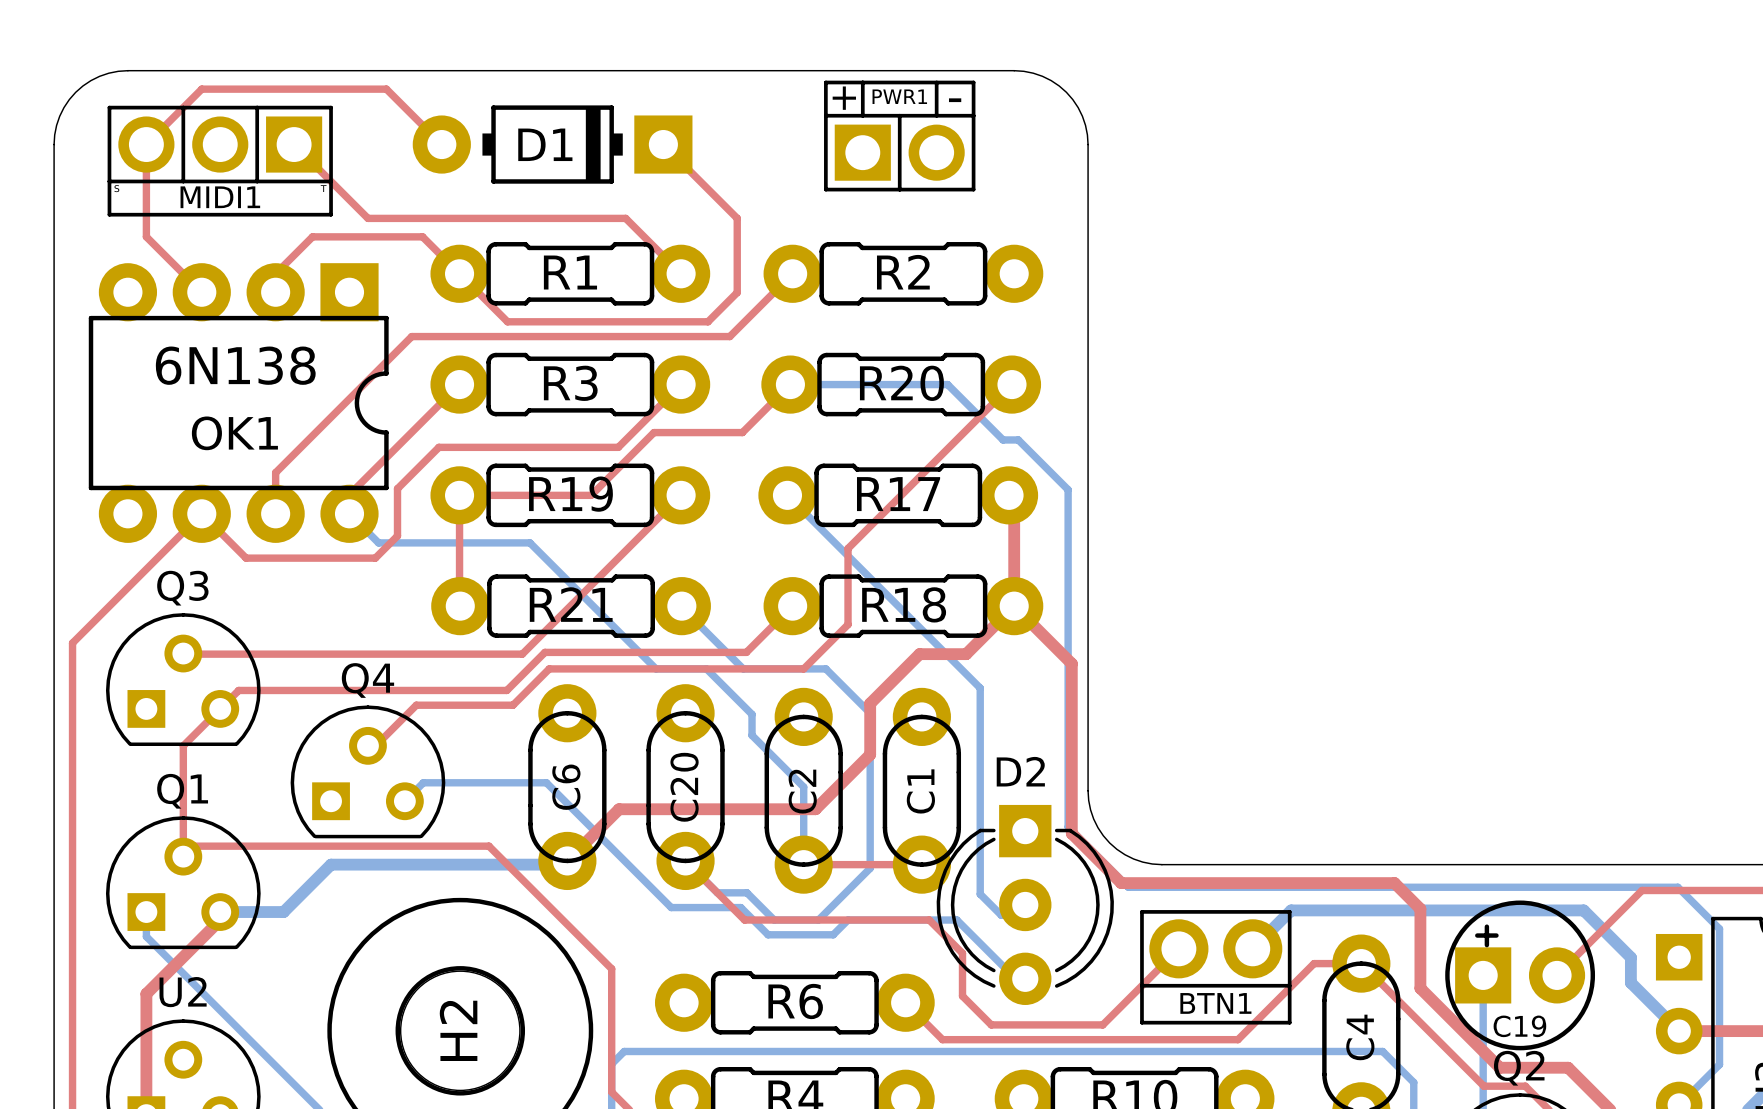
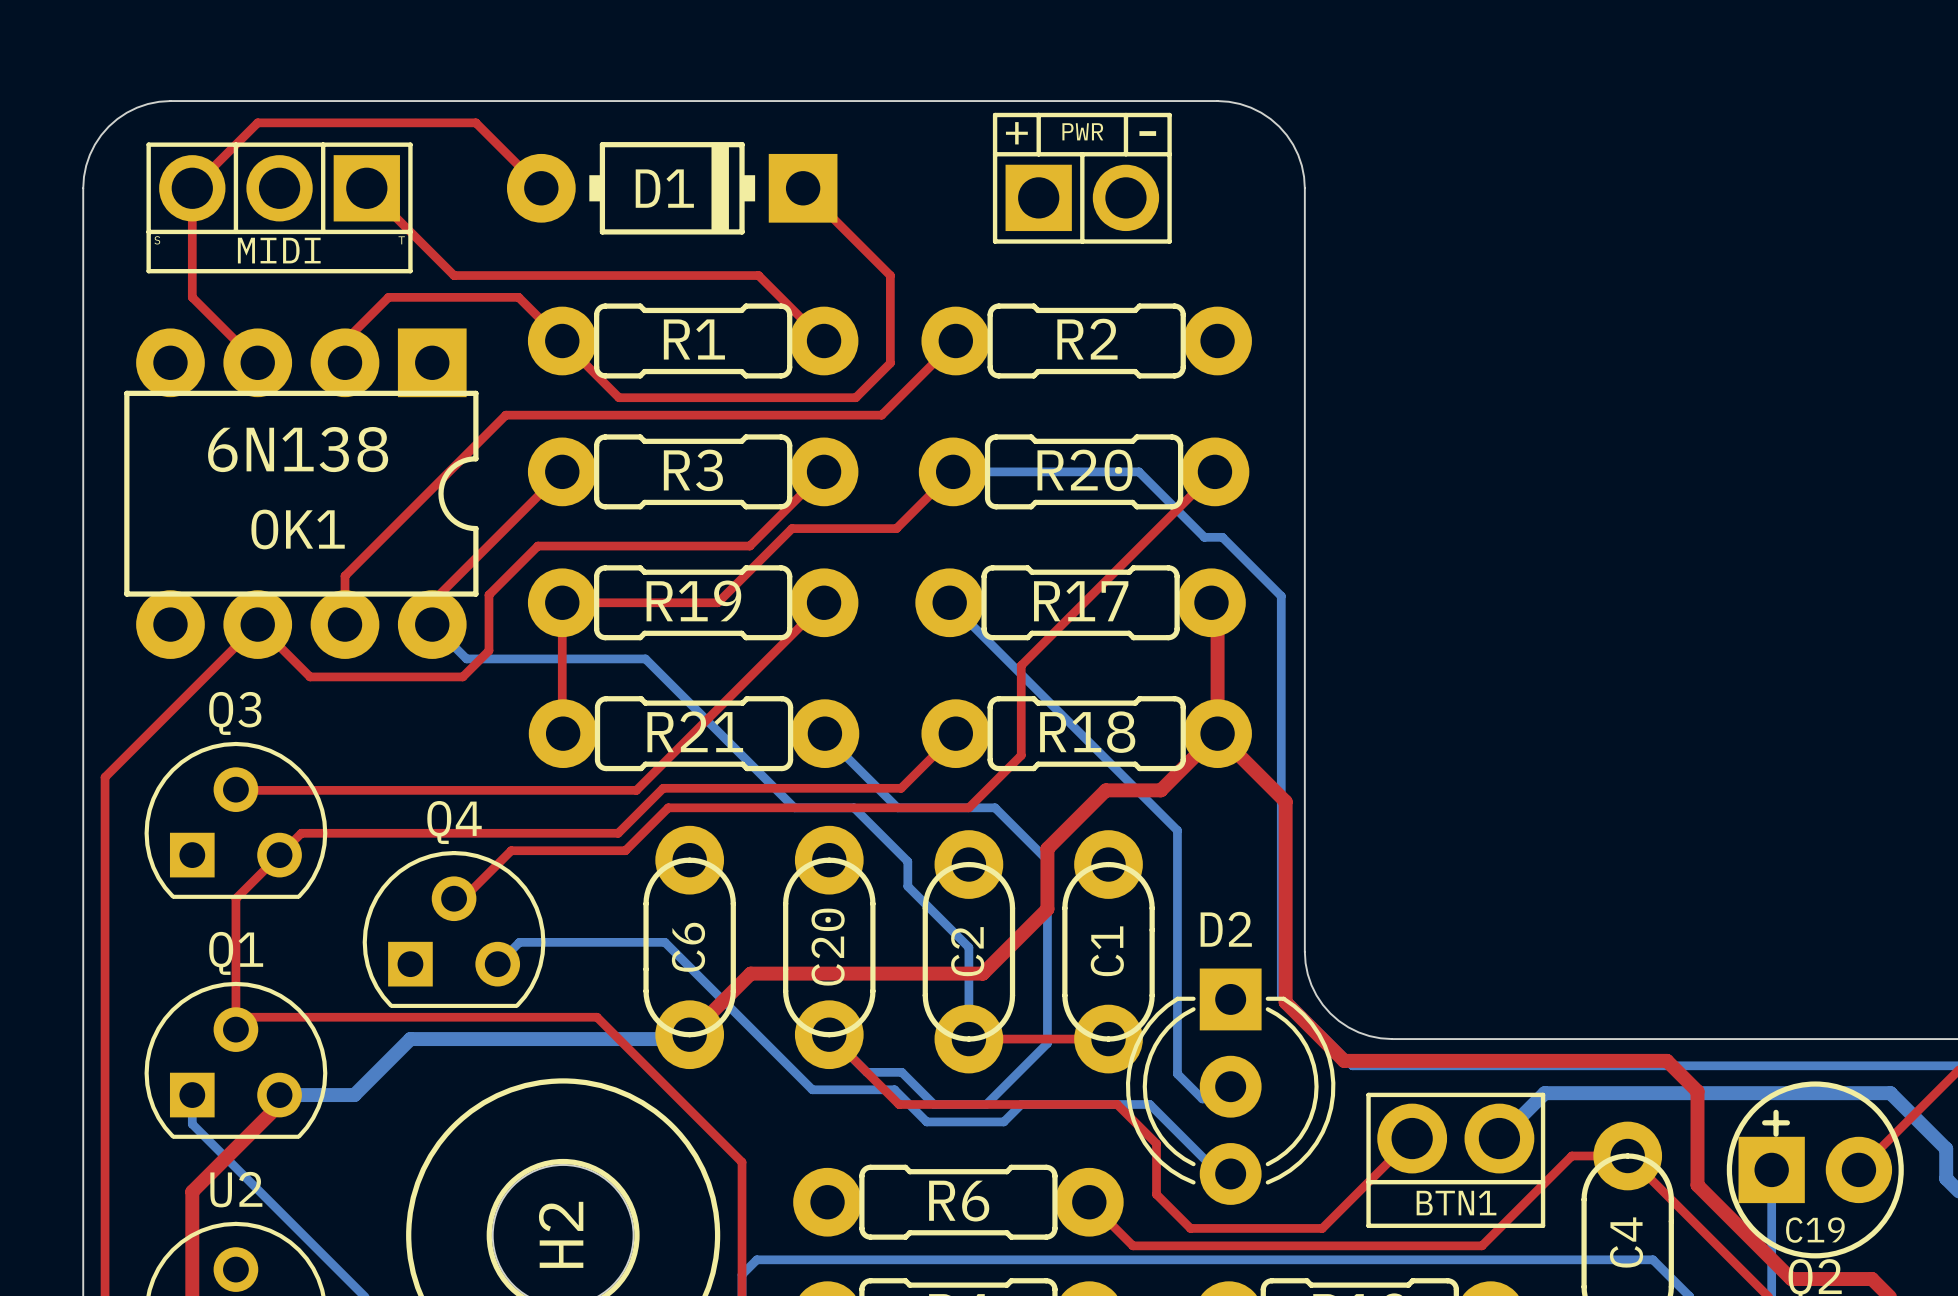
PWR1 name: PWR1 (899, 96) -> PWR (1082, 131)
MIDI1 name: MIDI1 (220, 197) -> MIDI (279, 250)

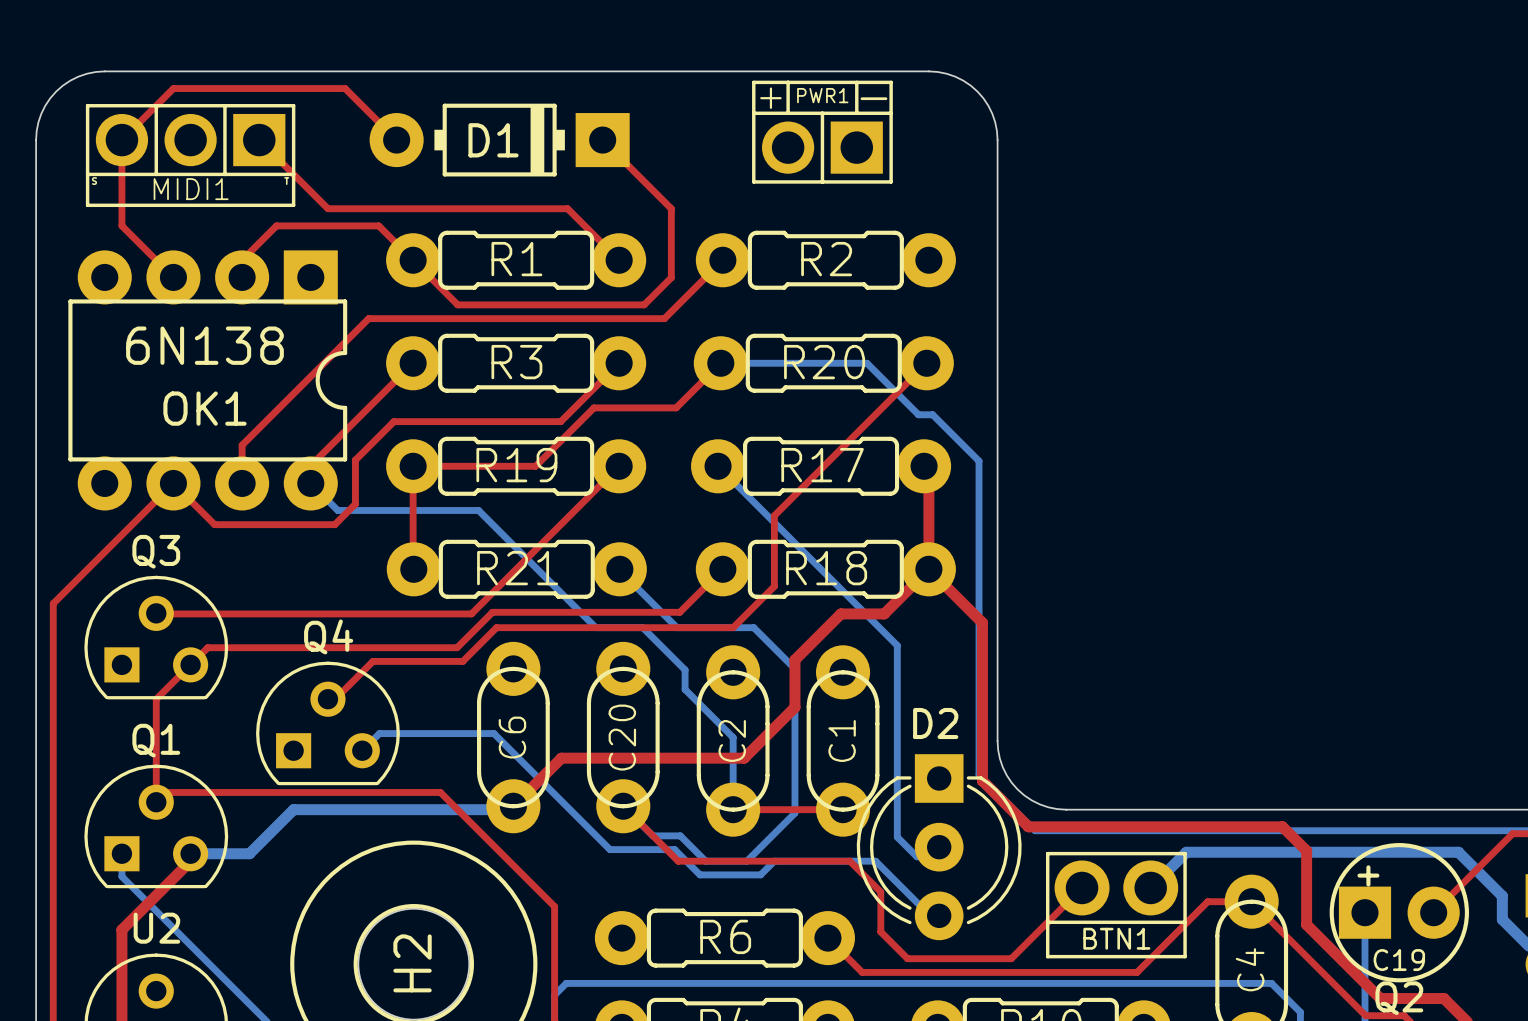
PWR: (1082, 178) -> none
PWR1: none -> (822, 132)
MIDI name: MIDI (279, 250) -> MIDI1 (191, 189)

